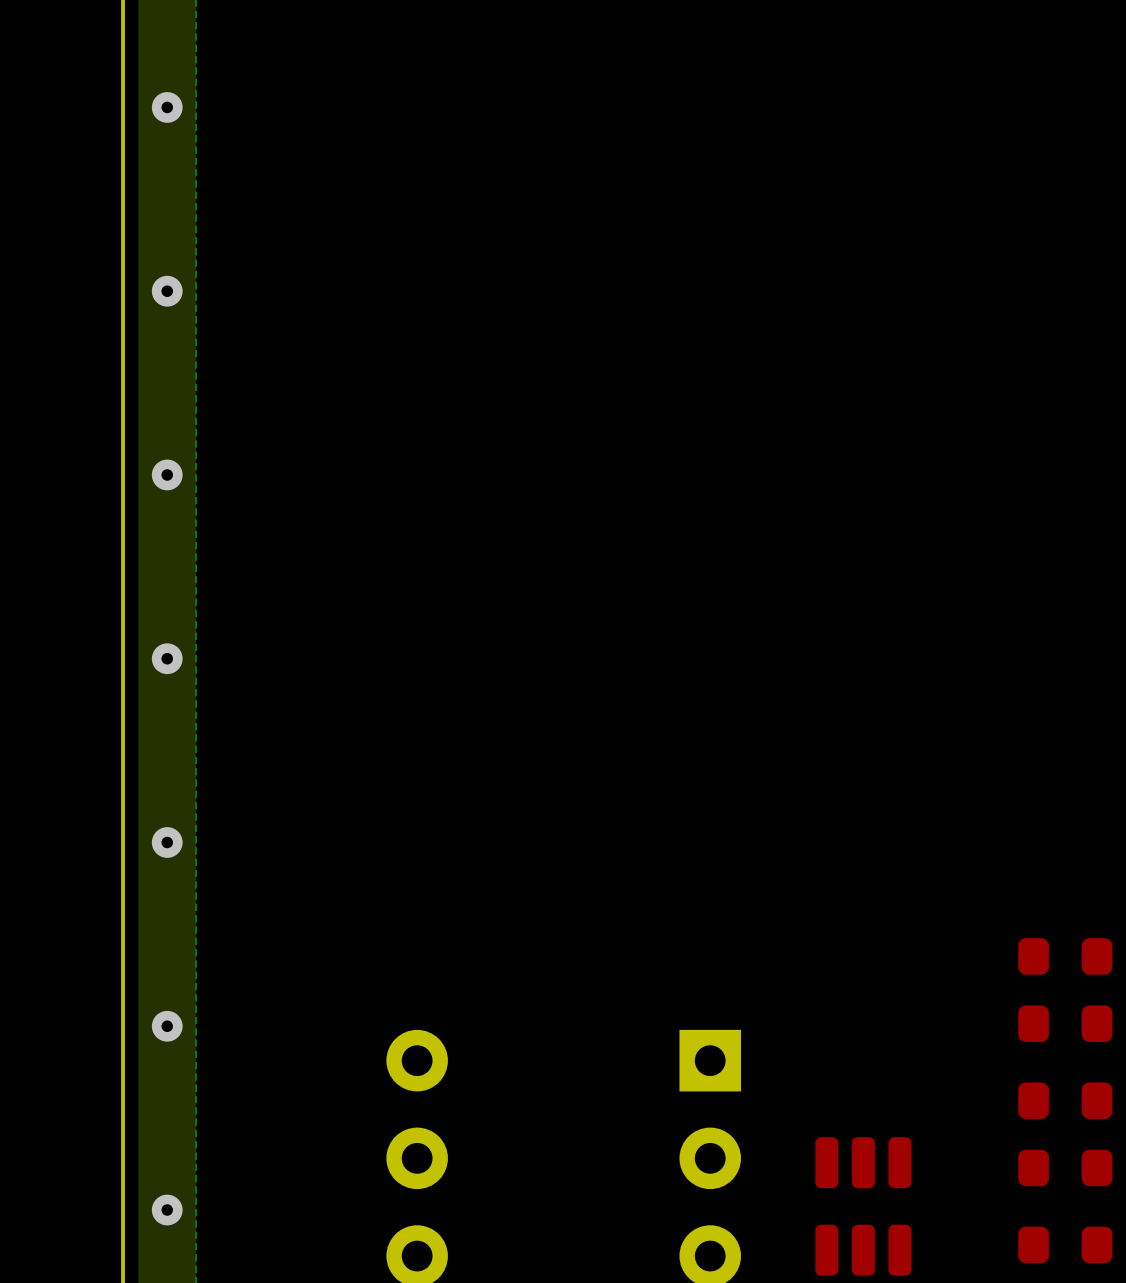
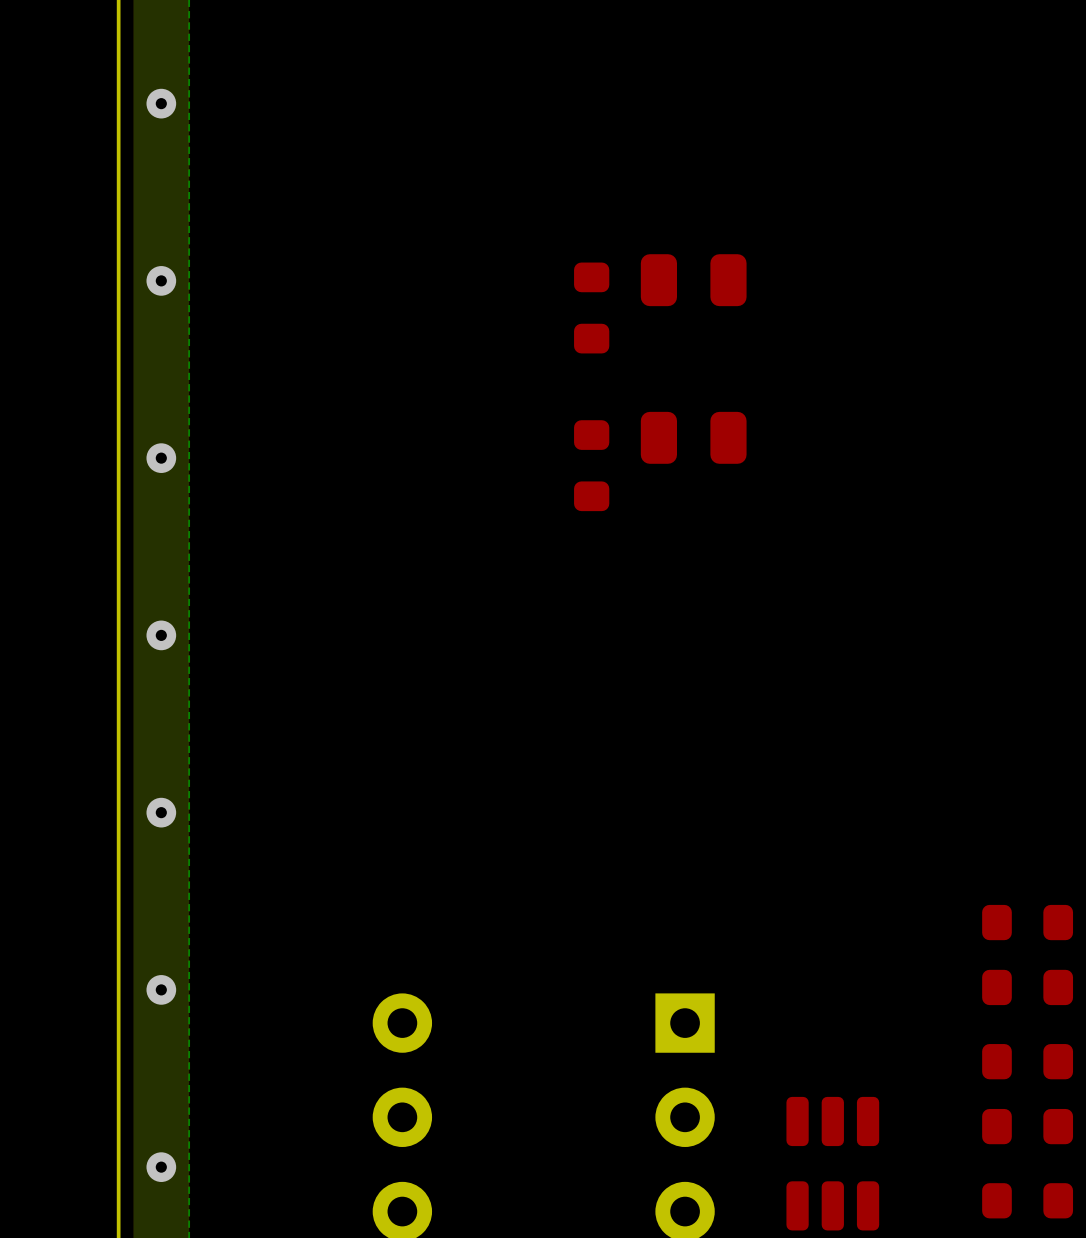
part: none -> (693, 280)
part: none -> (591, 307)
part: none -> (693, 437)
part: none -> (591, 465)

